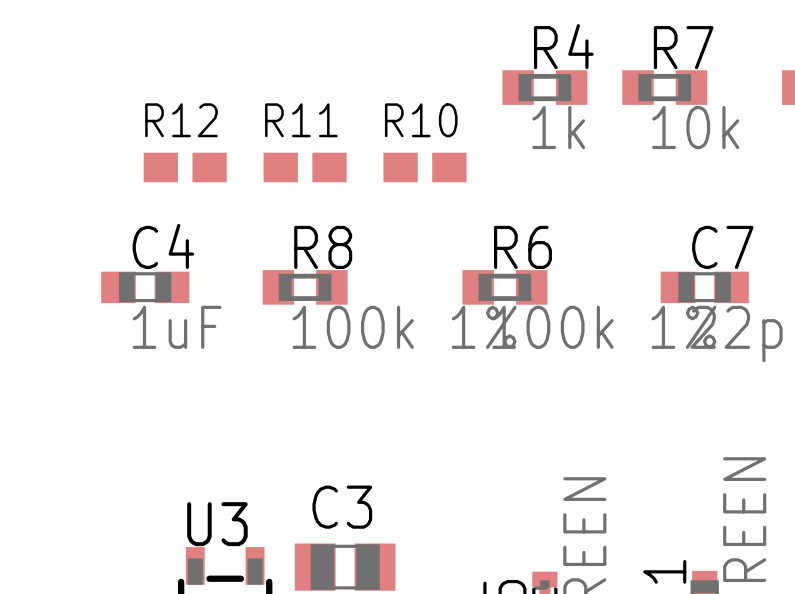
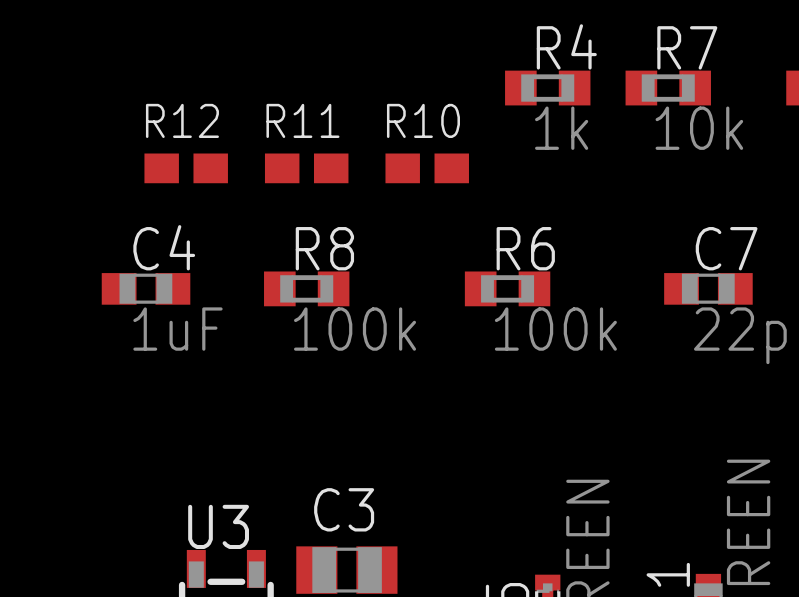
R8 value: 100k 1% (404, 327) -> 100k (355, 329)
R6 value: 100k 1% (604, 327) -> 100k (555, 329)

